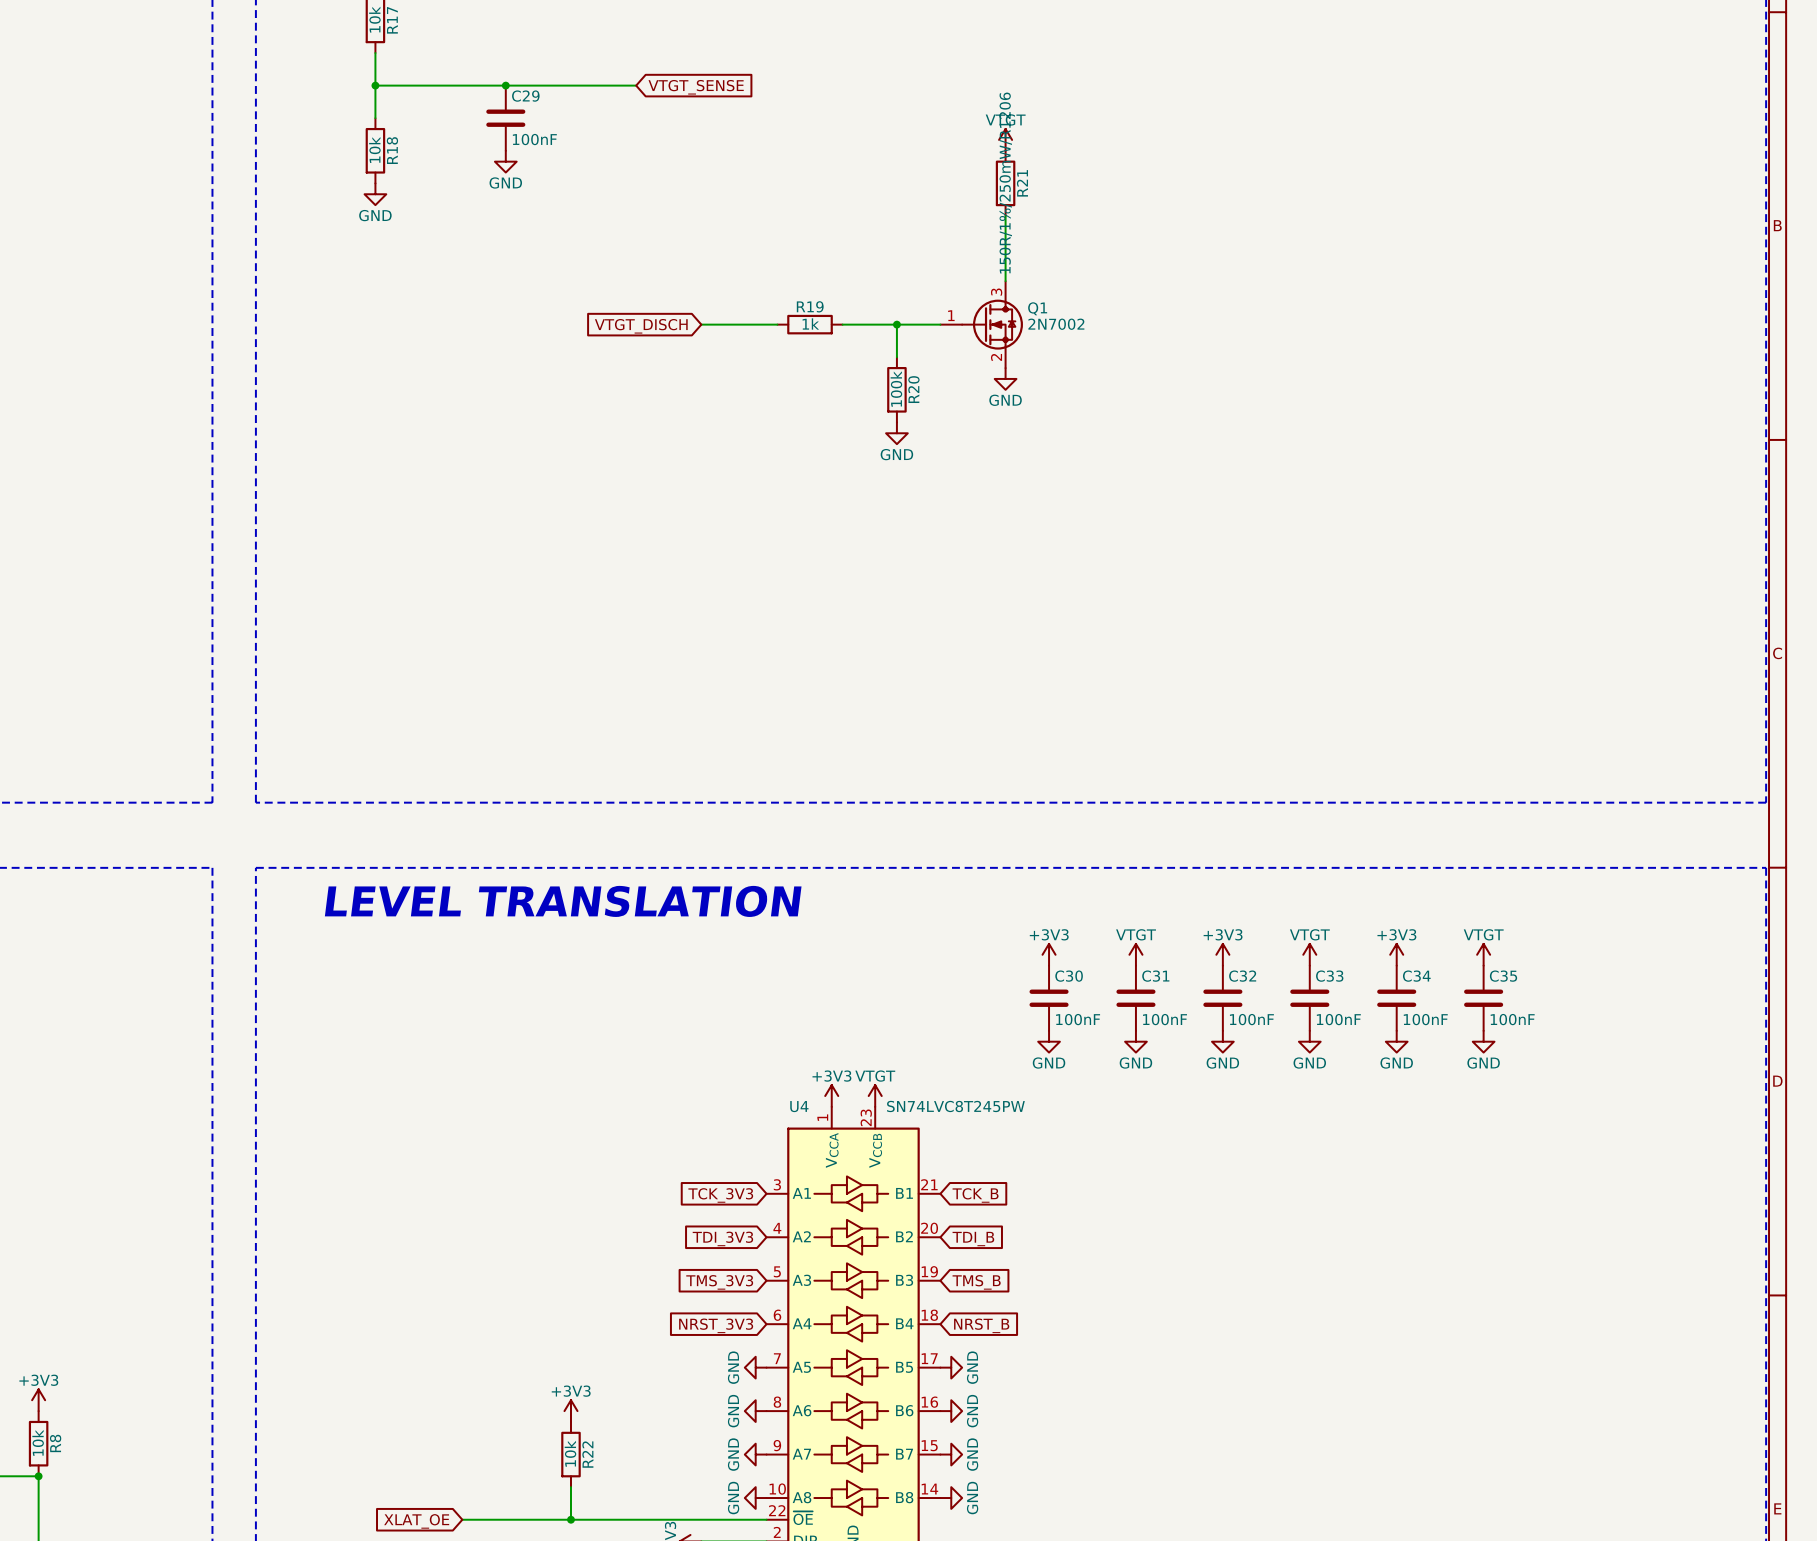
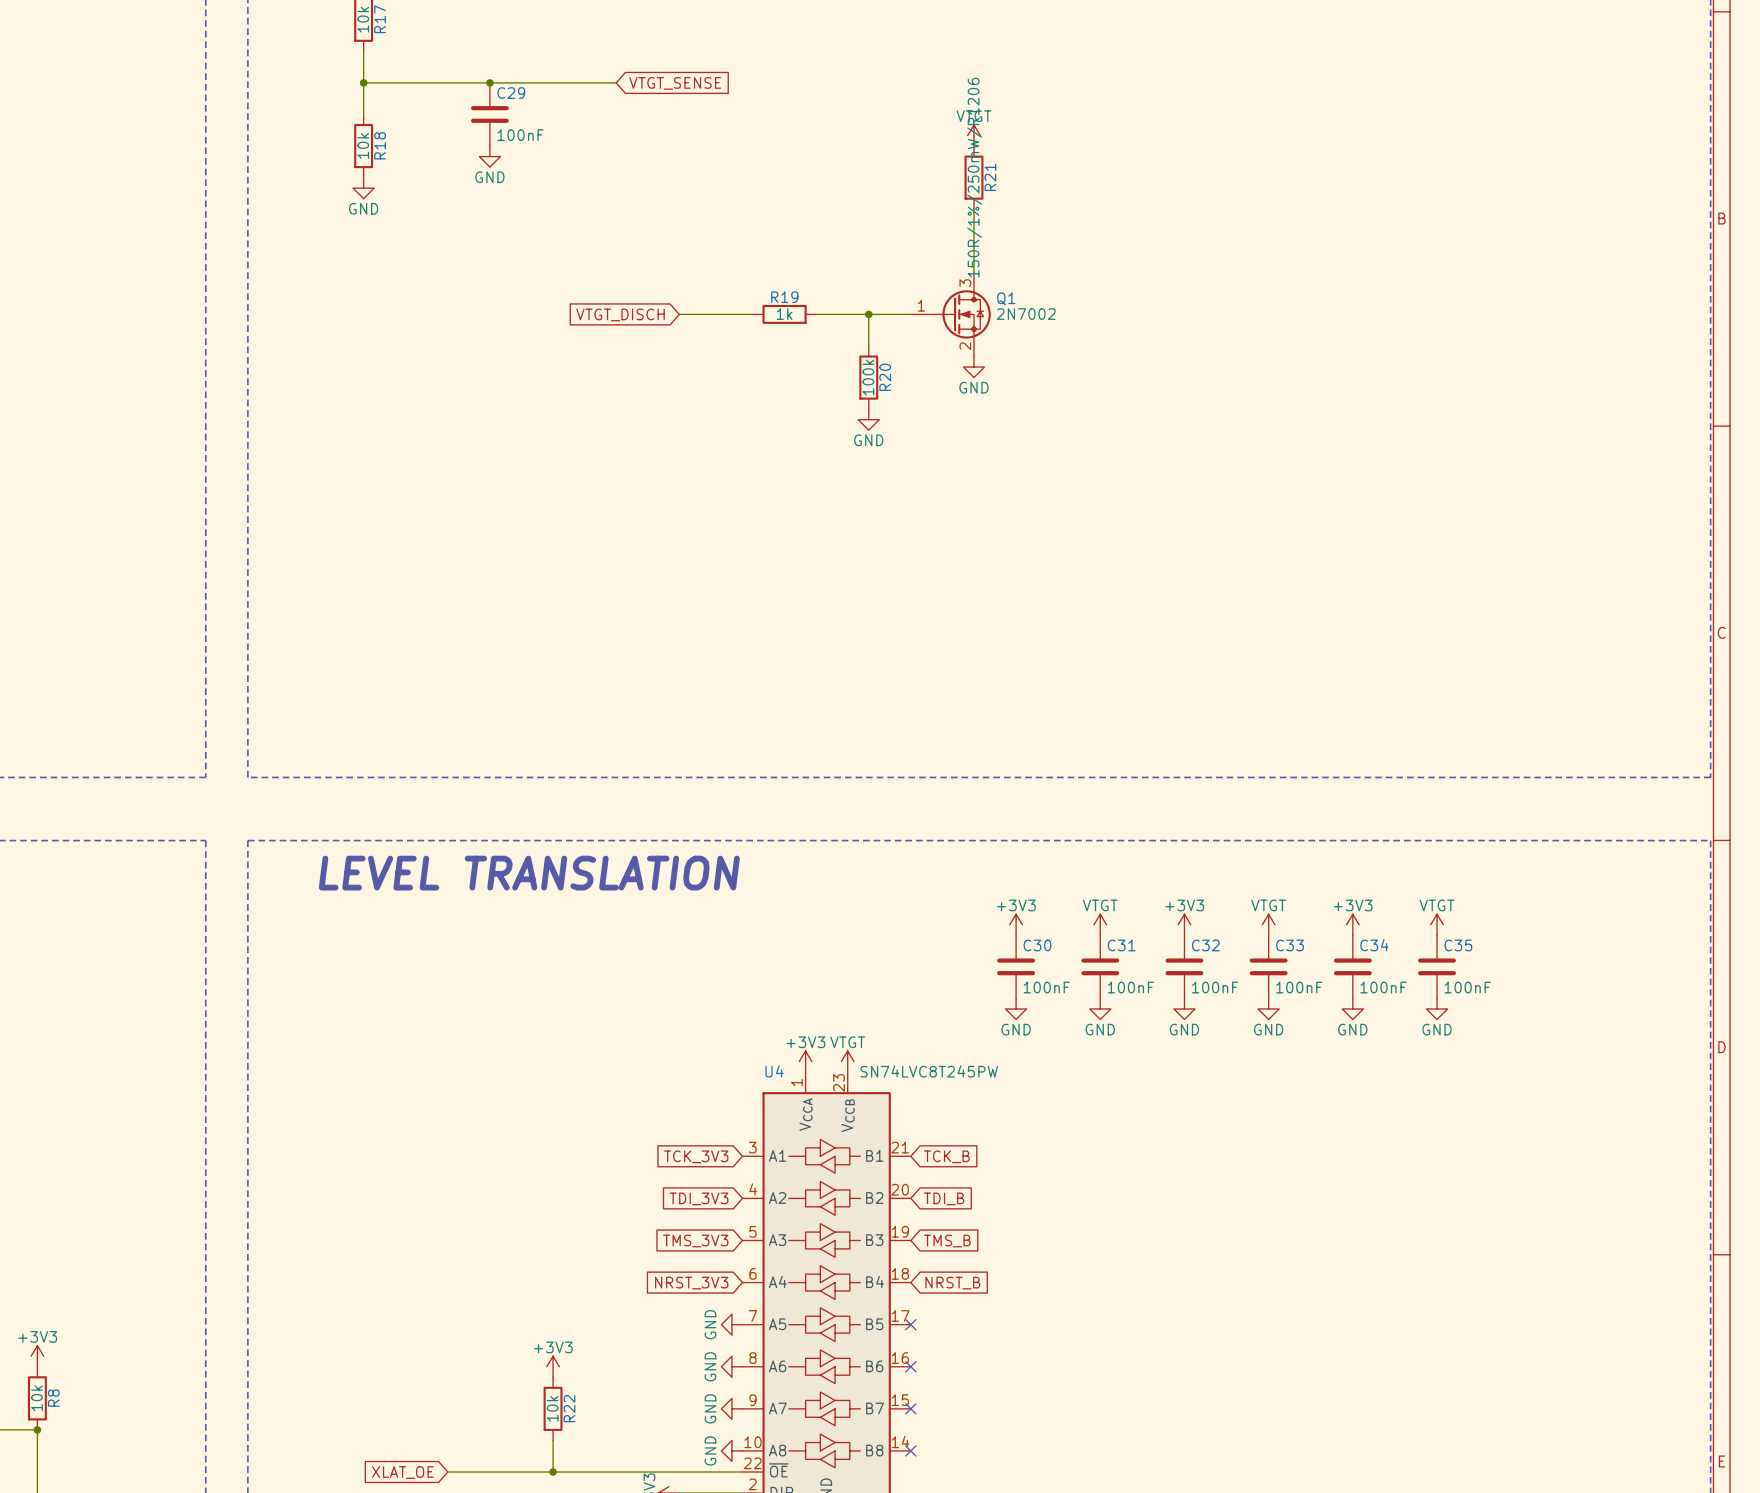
no-connect mark: none -> (910, 1324)
power symbol: GND (951, 1367) -> none
no-connect mark: none -> (910, 1366)
power symbol: GND (951, 1411) -> none
no-connect mark: none -> (910, 1408)
power symbol: GND (951, 1454) -> none
no-connect mark: none -> (910, 1450)
power symbol: GND (951, 1498) -> none

